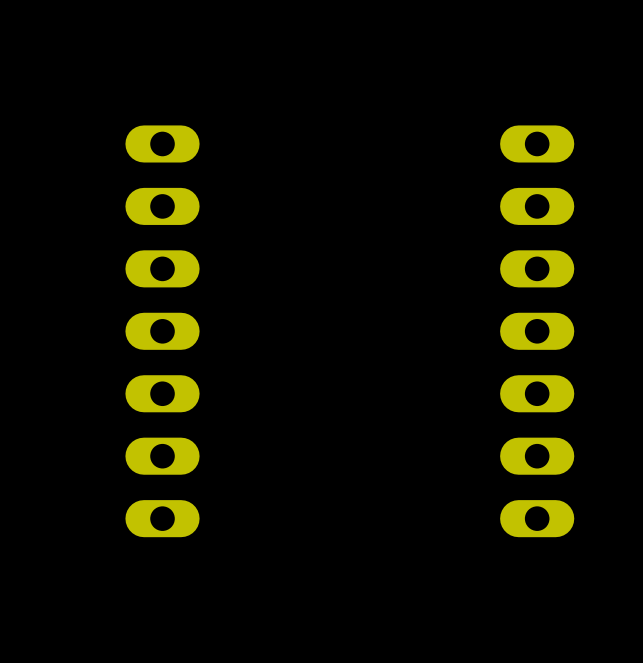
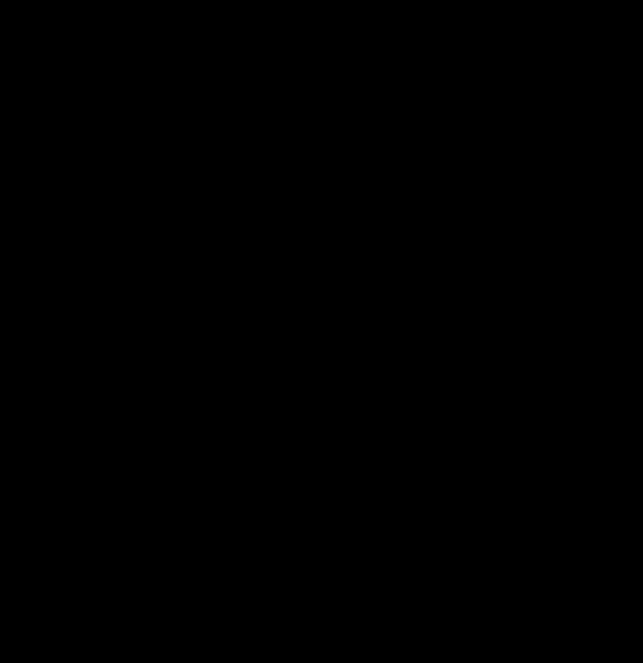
part: (162, 331) -> none
part: (537, 331) -> none

